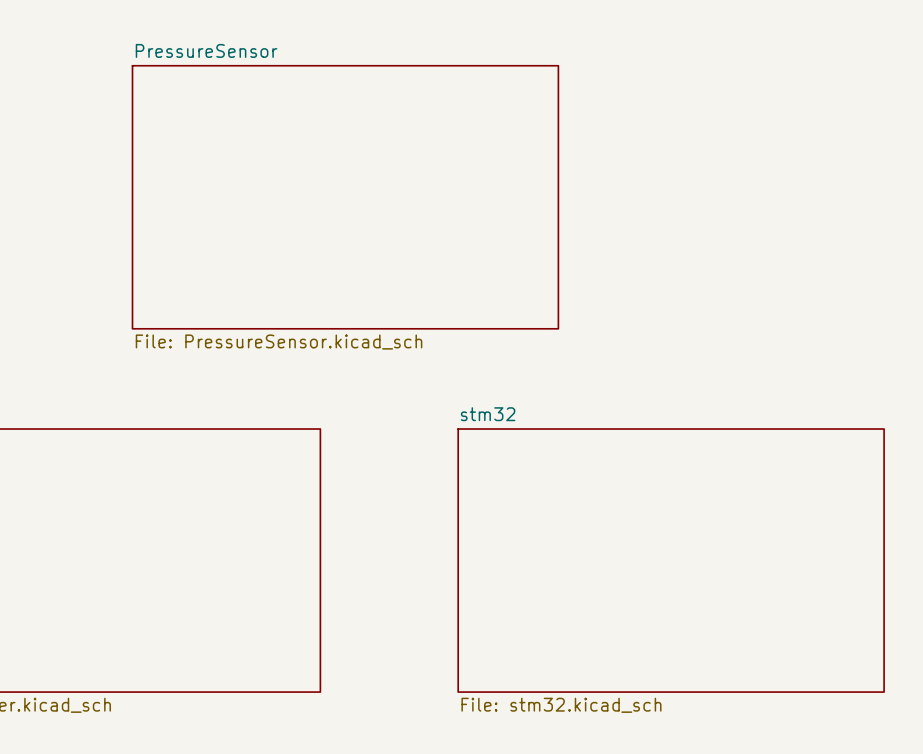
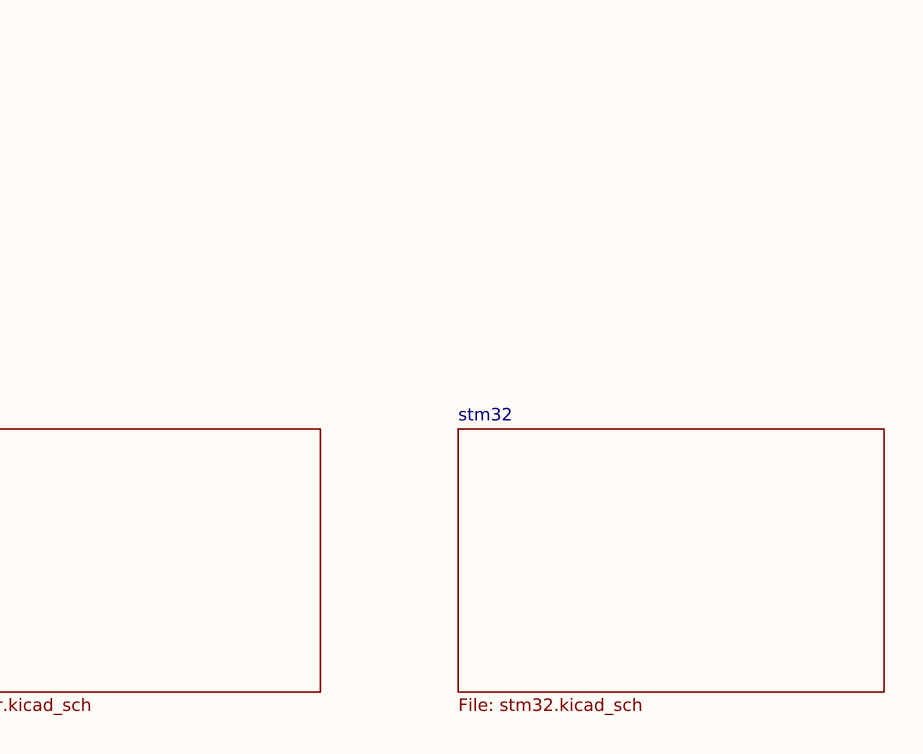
sheet PressureSensor: File: PressureSensor.kicad_sch (345, 197) -> none

